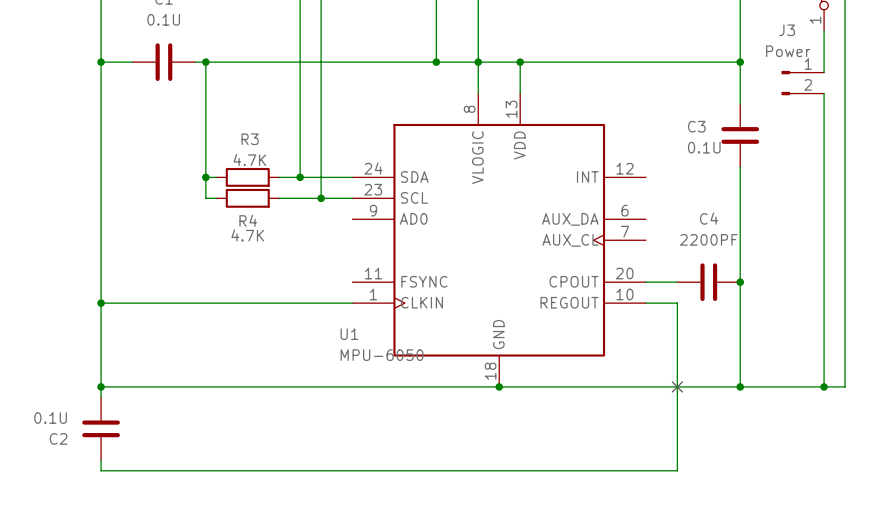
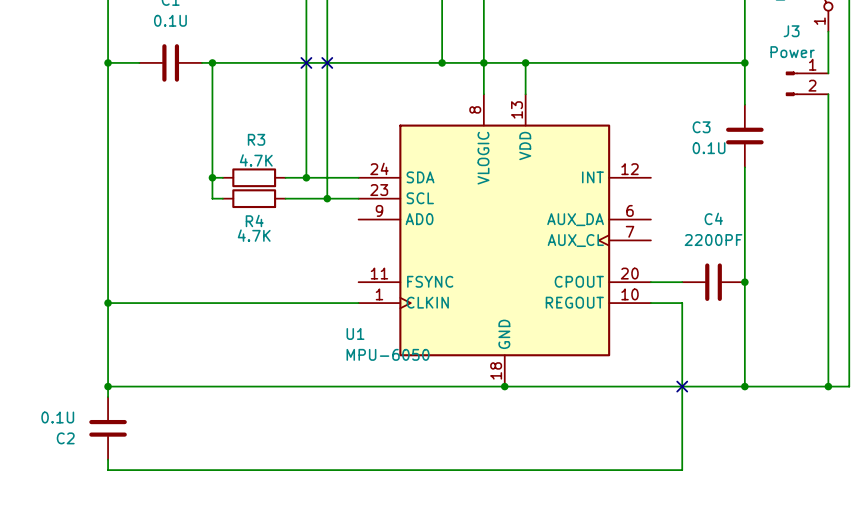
no-connect mark: none -> (306, 62)
no-connect mark: none -> (327, 62)

